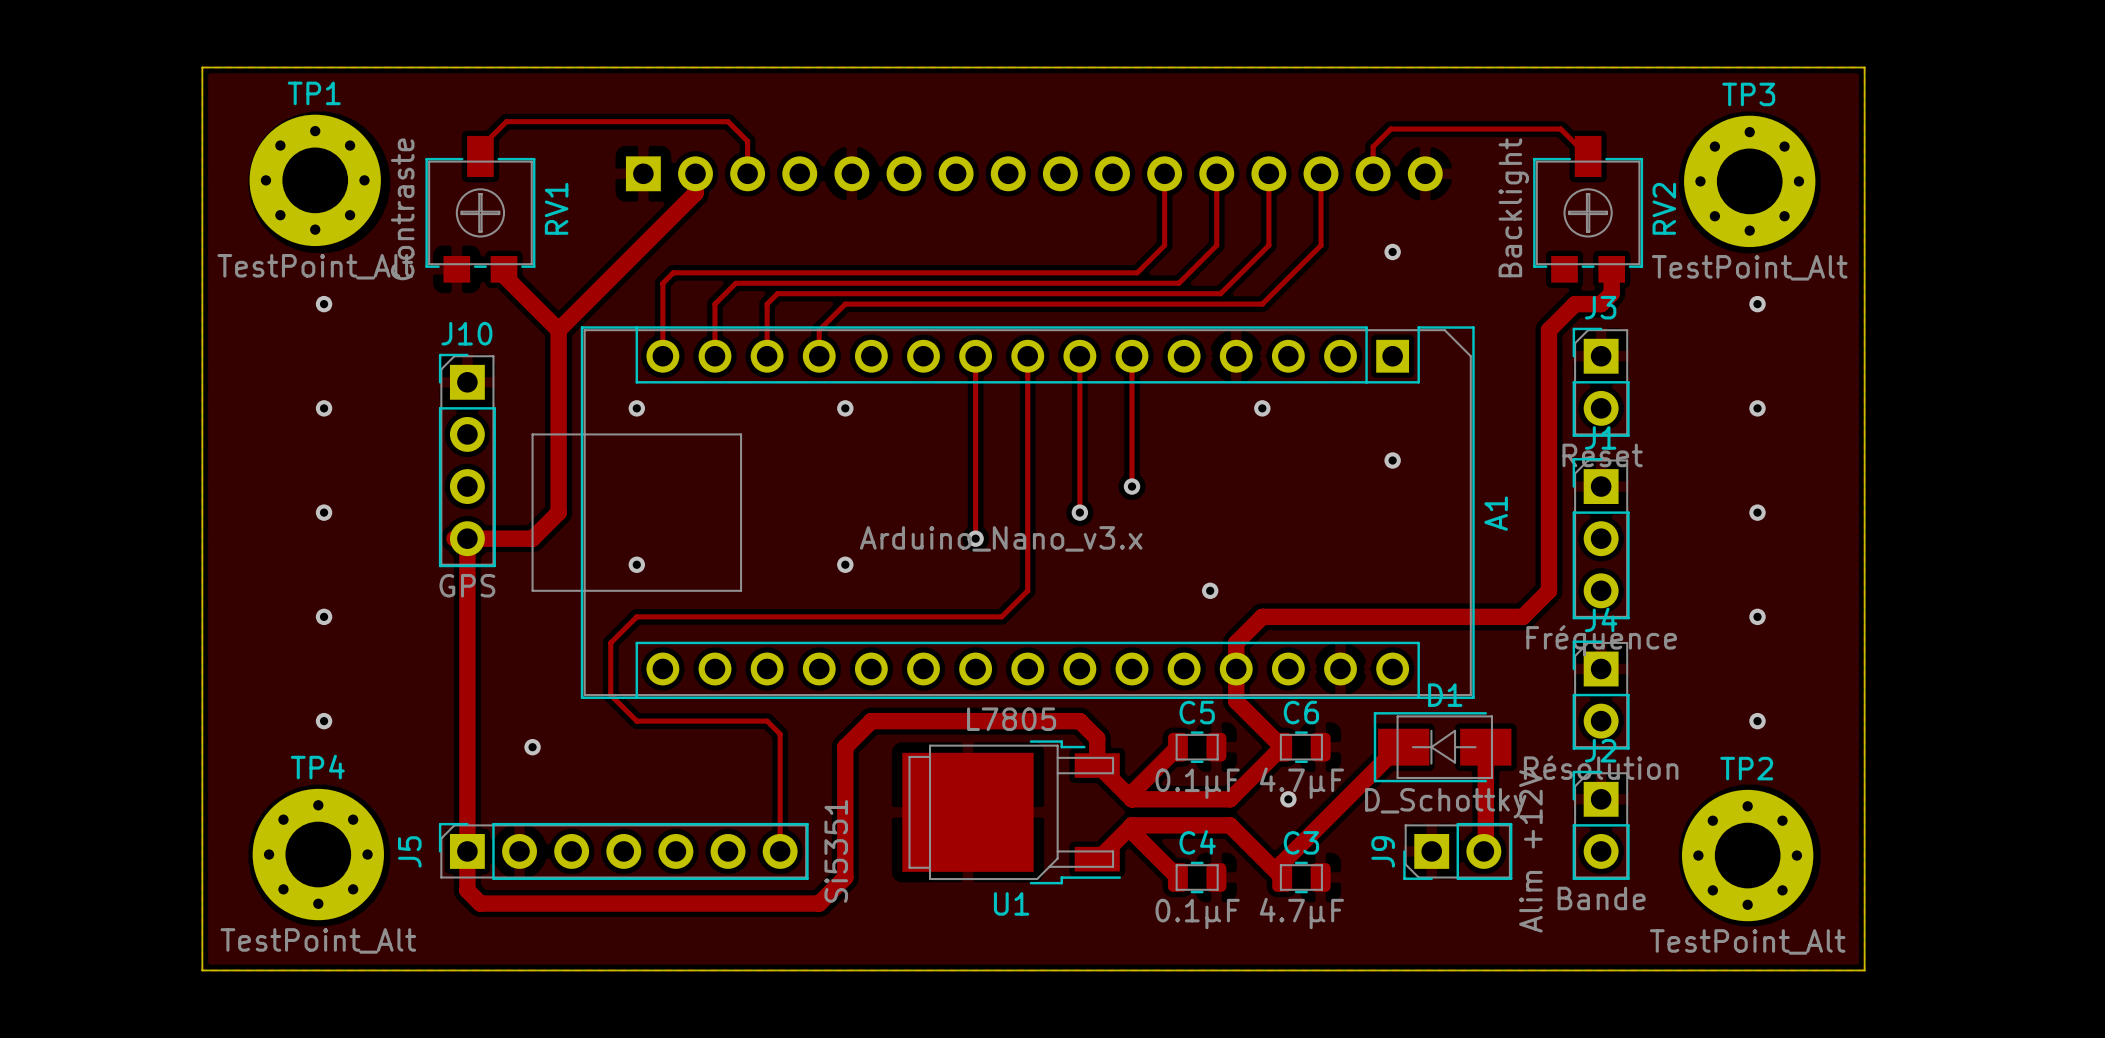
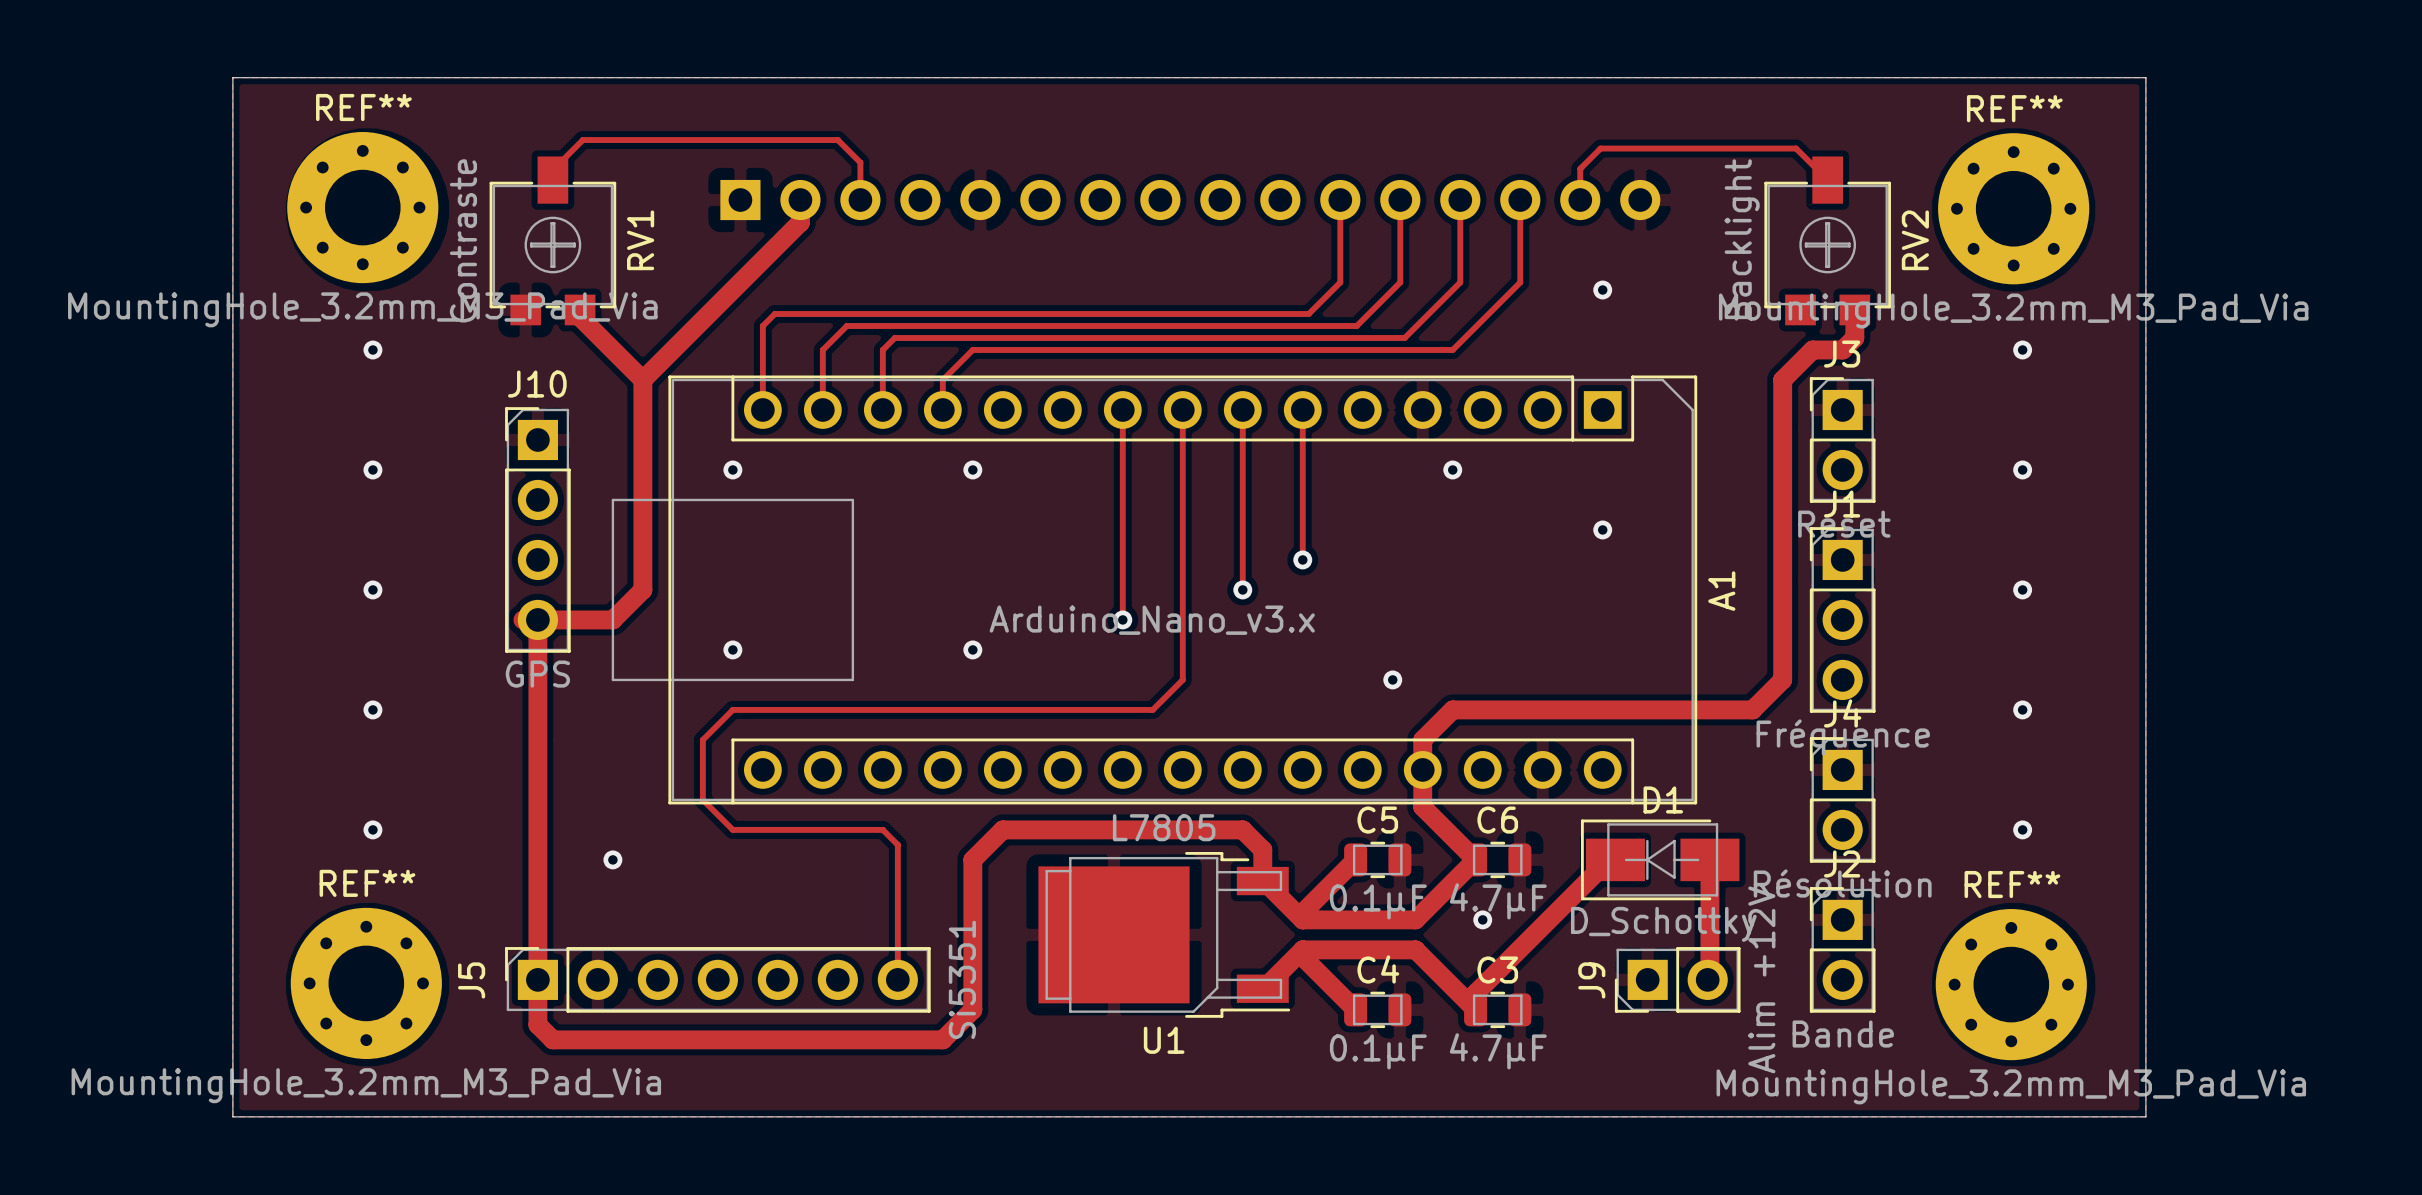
TP1 name: TP1 (314, 93) -> REF** (363, 107)
TP3 name: TP3 (1748, 94) -> REF** (2014, 108)
TP1 value: TestPoint_Alt (315, 266) -> MountingHole_3.2mm_M3_Pad_Via (362, 309)
TP3 value: TestPoint_Alt (1749, 267) -> MountingHole_3.2mm_M3_Pad_Via (2013, 311)
TP4 name: TP4 (317, 767) -> REF** (367, 883)
TP2 name: TP2 (1746, 768) -> REF** (2012, 884)
TP4 value: TestPoint_Alt (318, 940) -> MountingHole_3.2mm_M3_Pad_Via (366, 1085)
TP2 value: TestPoint_Alt (1747, 941) -> MountingHole_3.2mm_M3_Pad_Via (2011, 1086)

